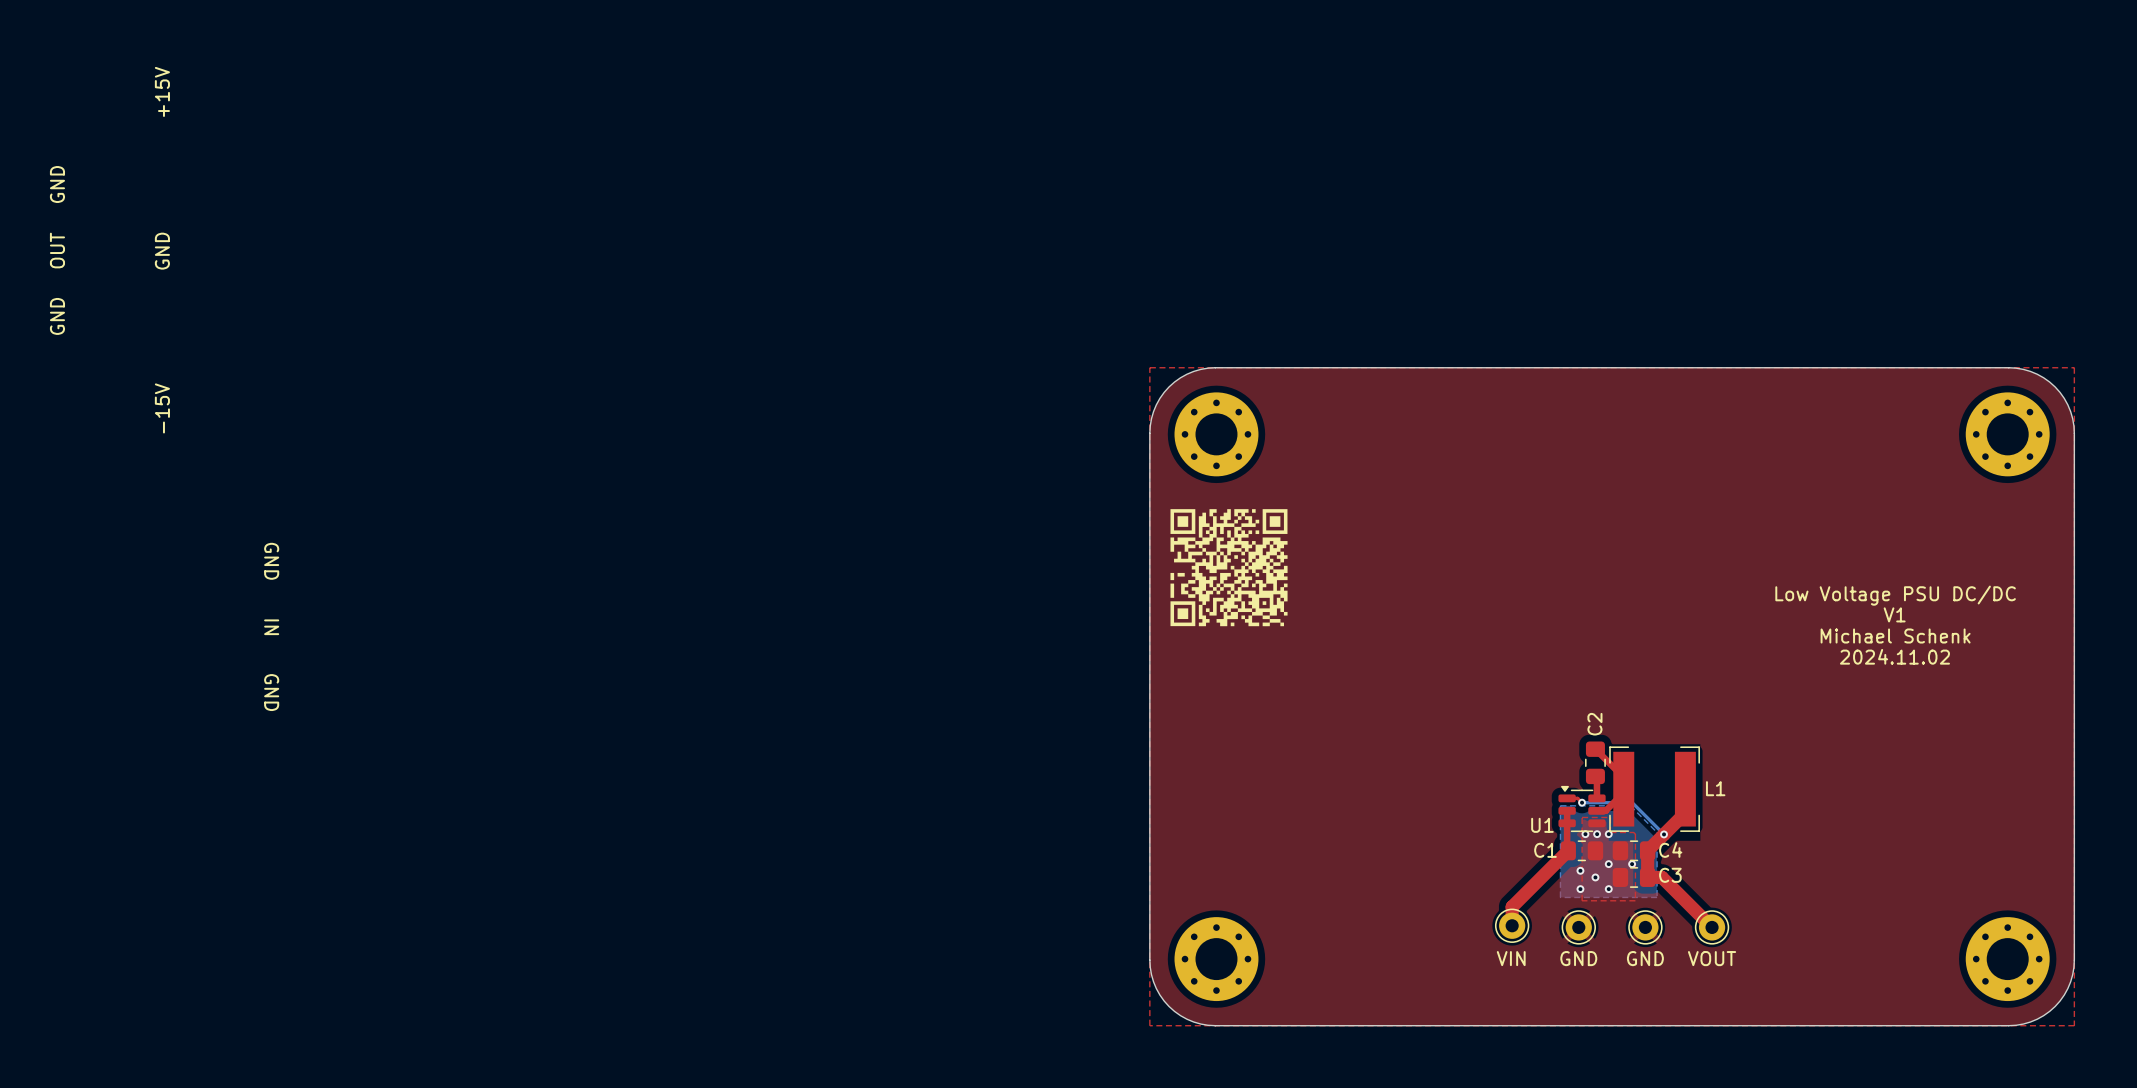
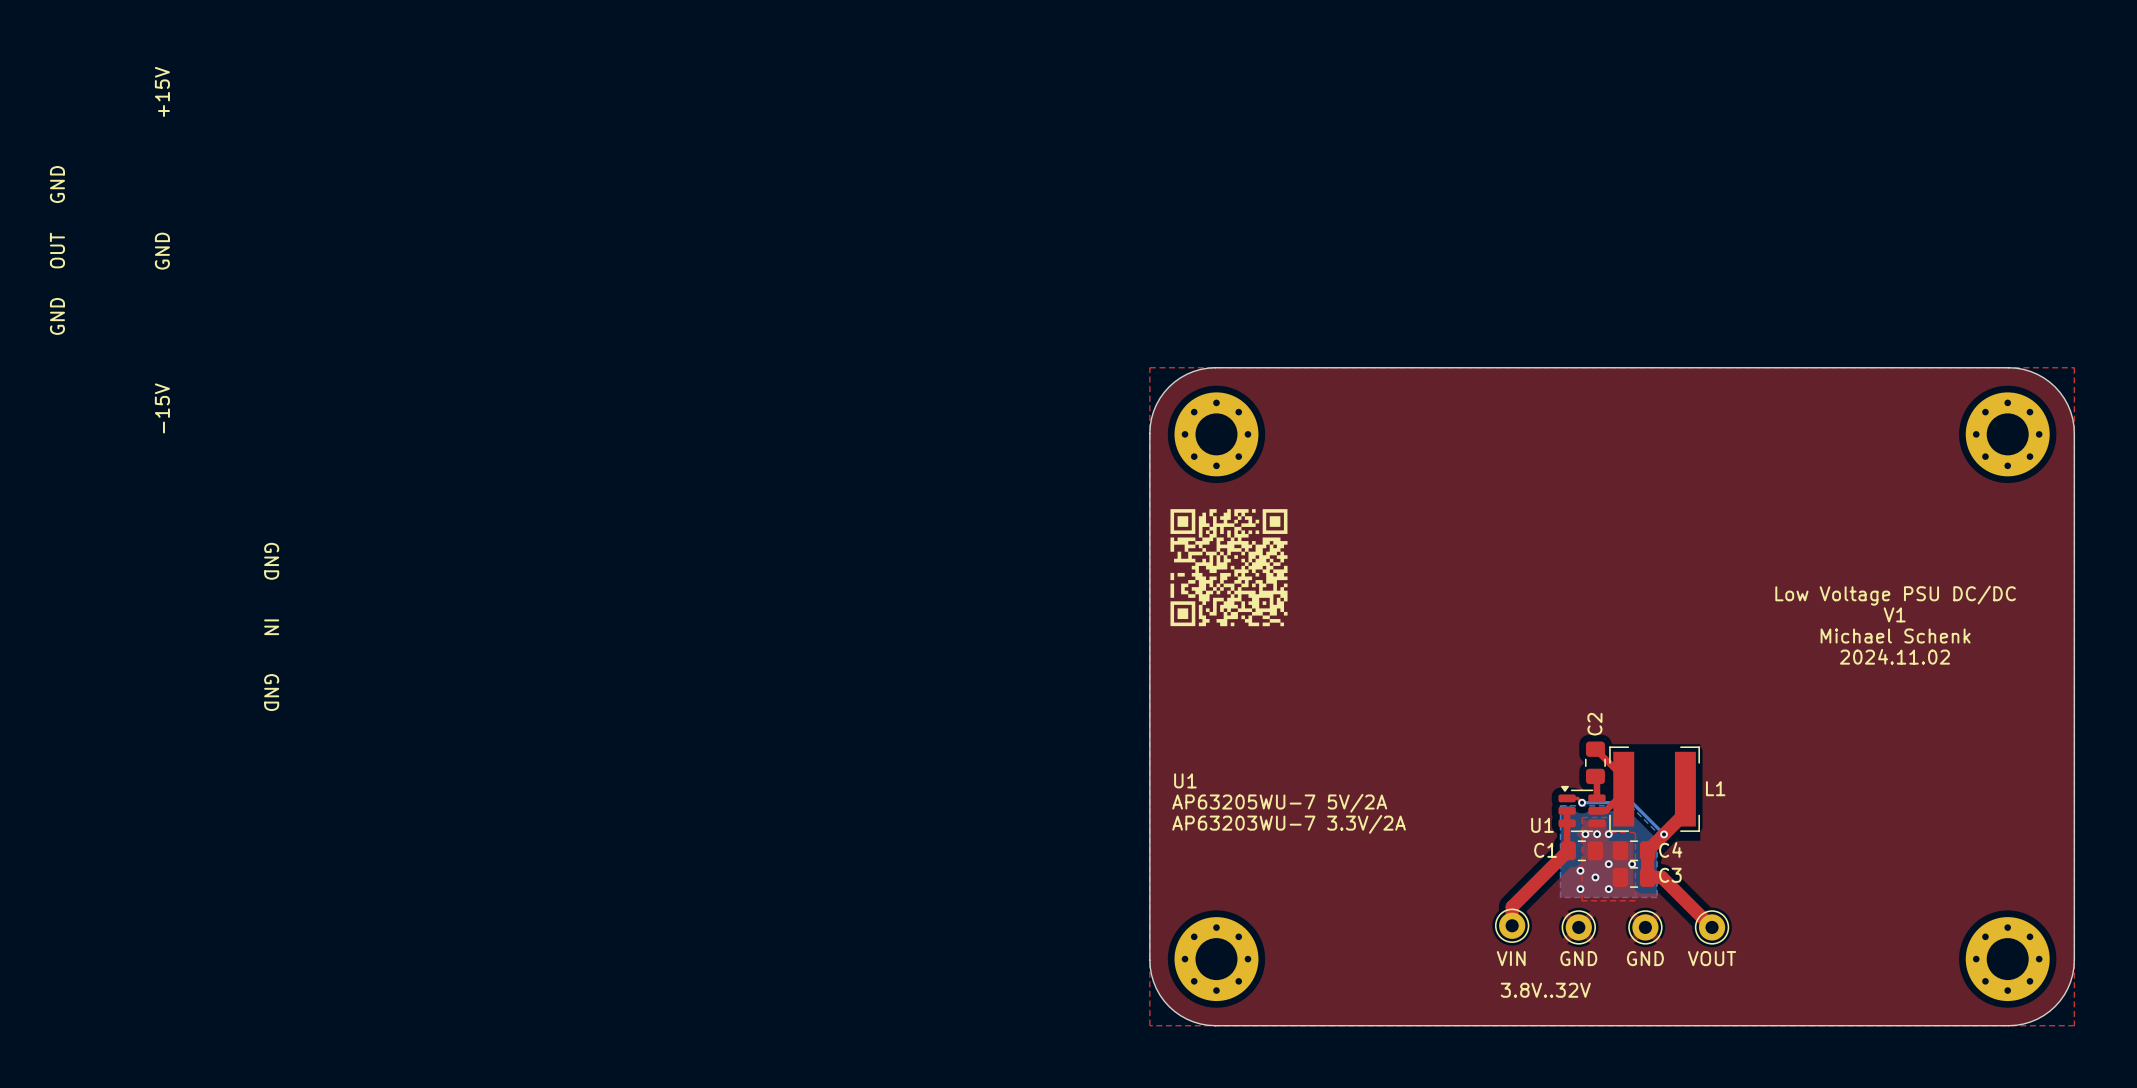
text: none -> U1 (1185, 780)
text: none -> AP63205WU-7 5V/2A (1279, 803)
text: none -> AP63203WU-7 3.3V/2A (1289, 824)
text: none -> 3.8V..32V (1545, 990)

